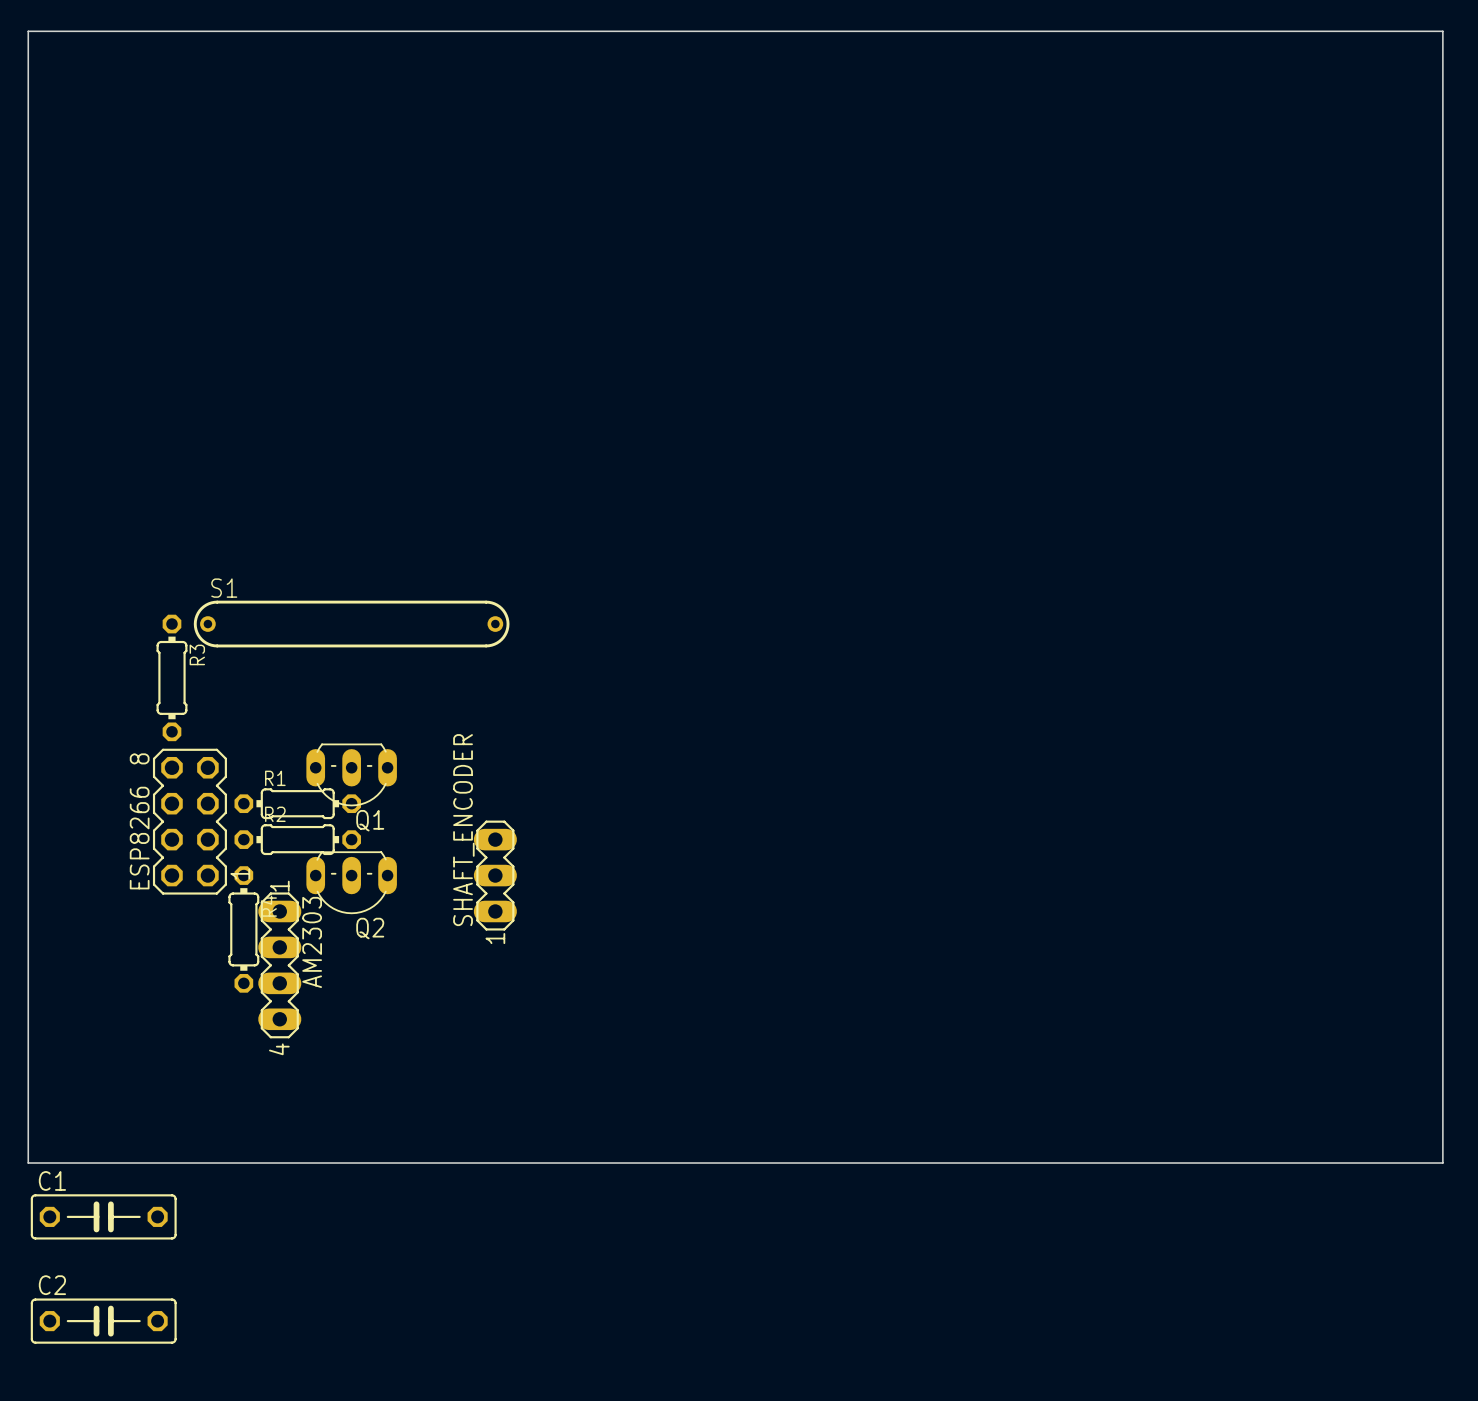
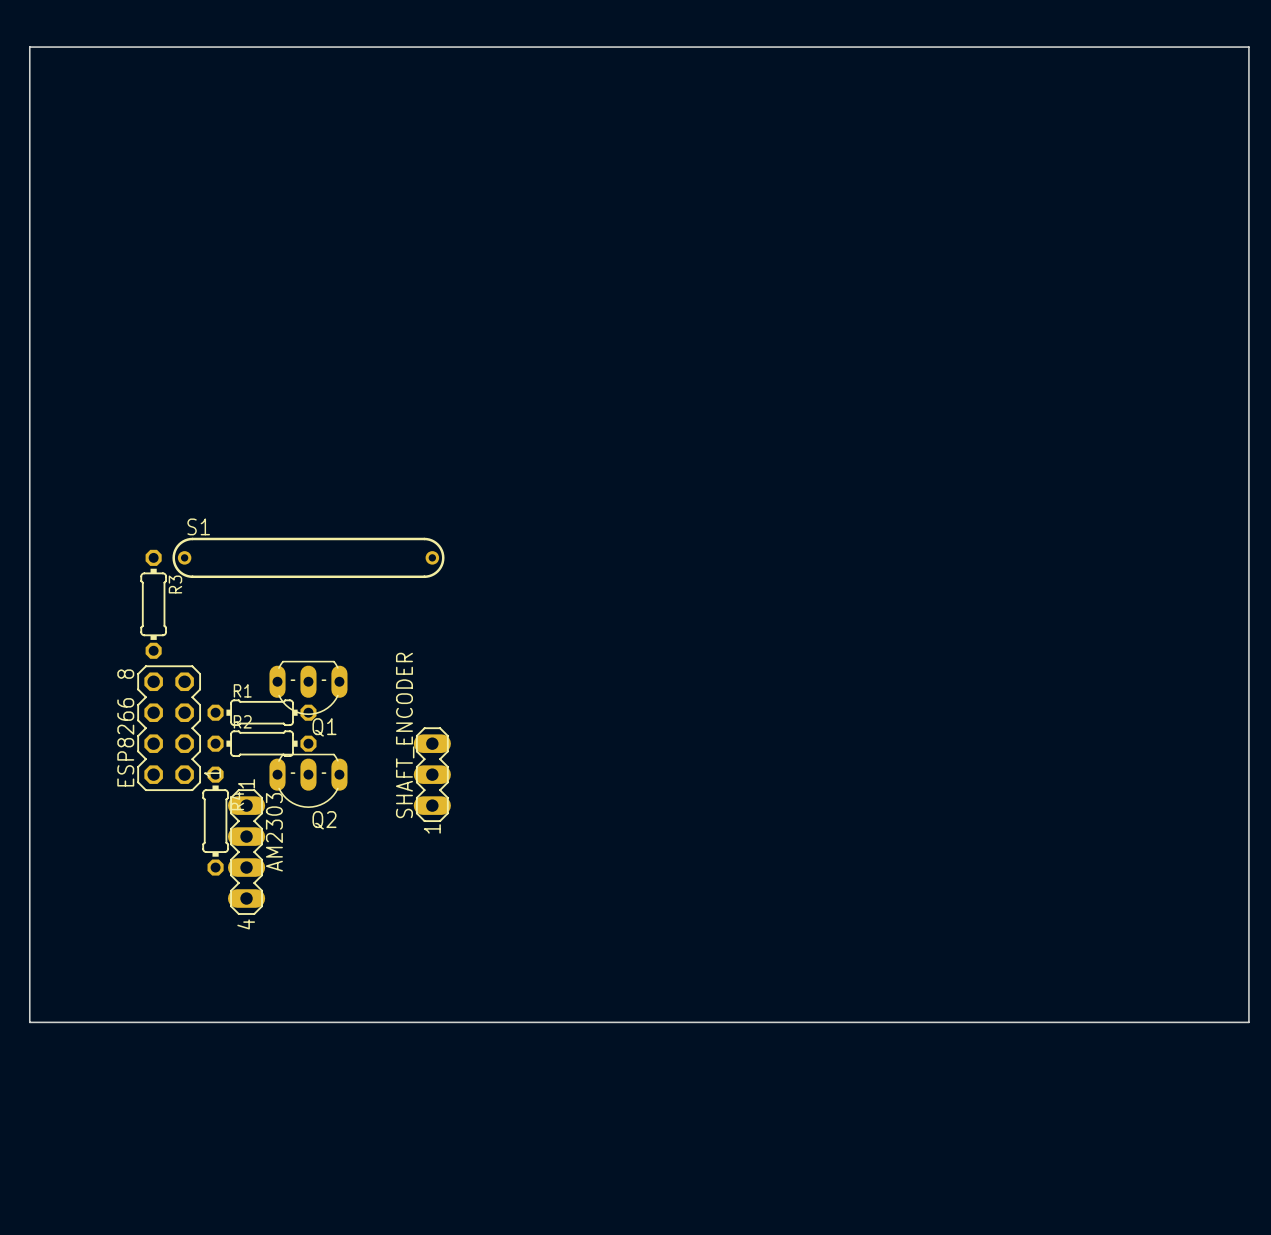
C1: (103, 1216) -> none
C2: (103, 1321) -> none

